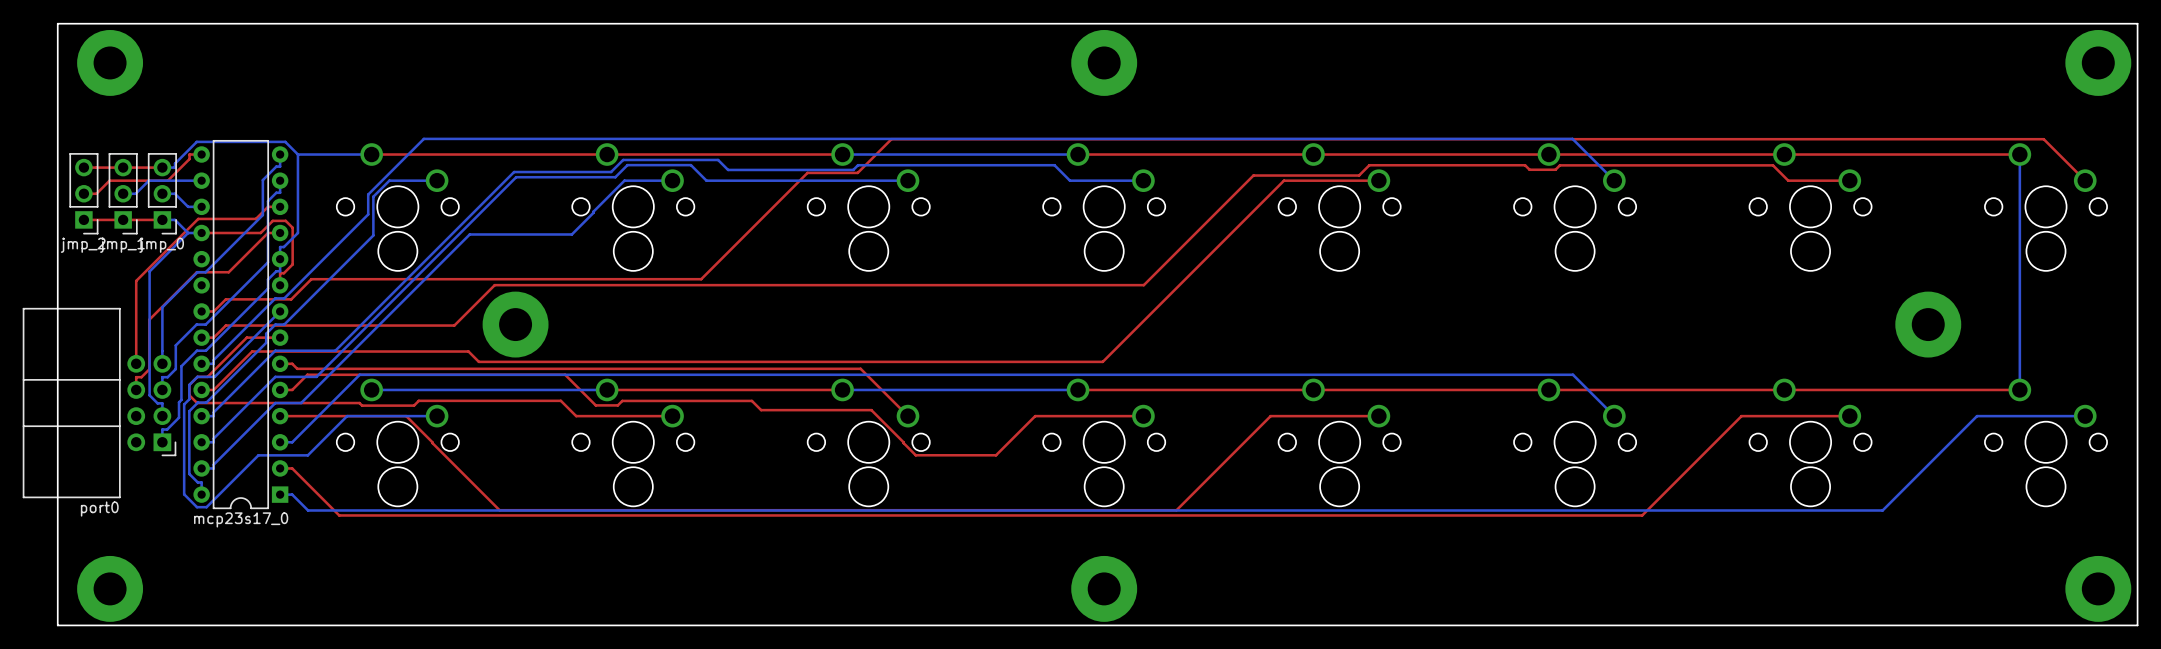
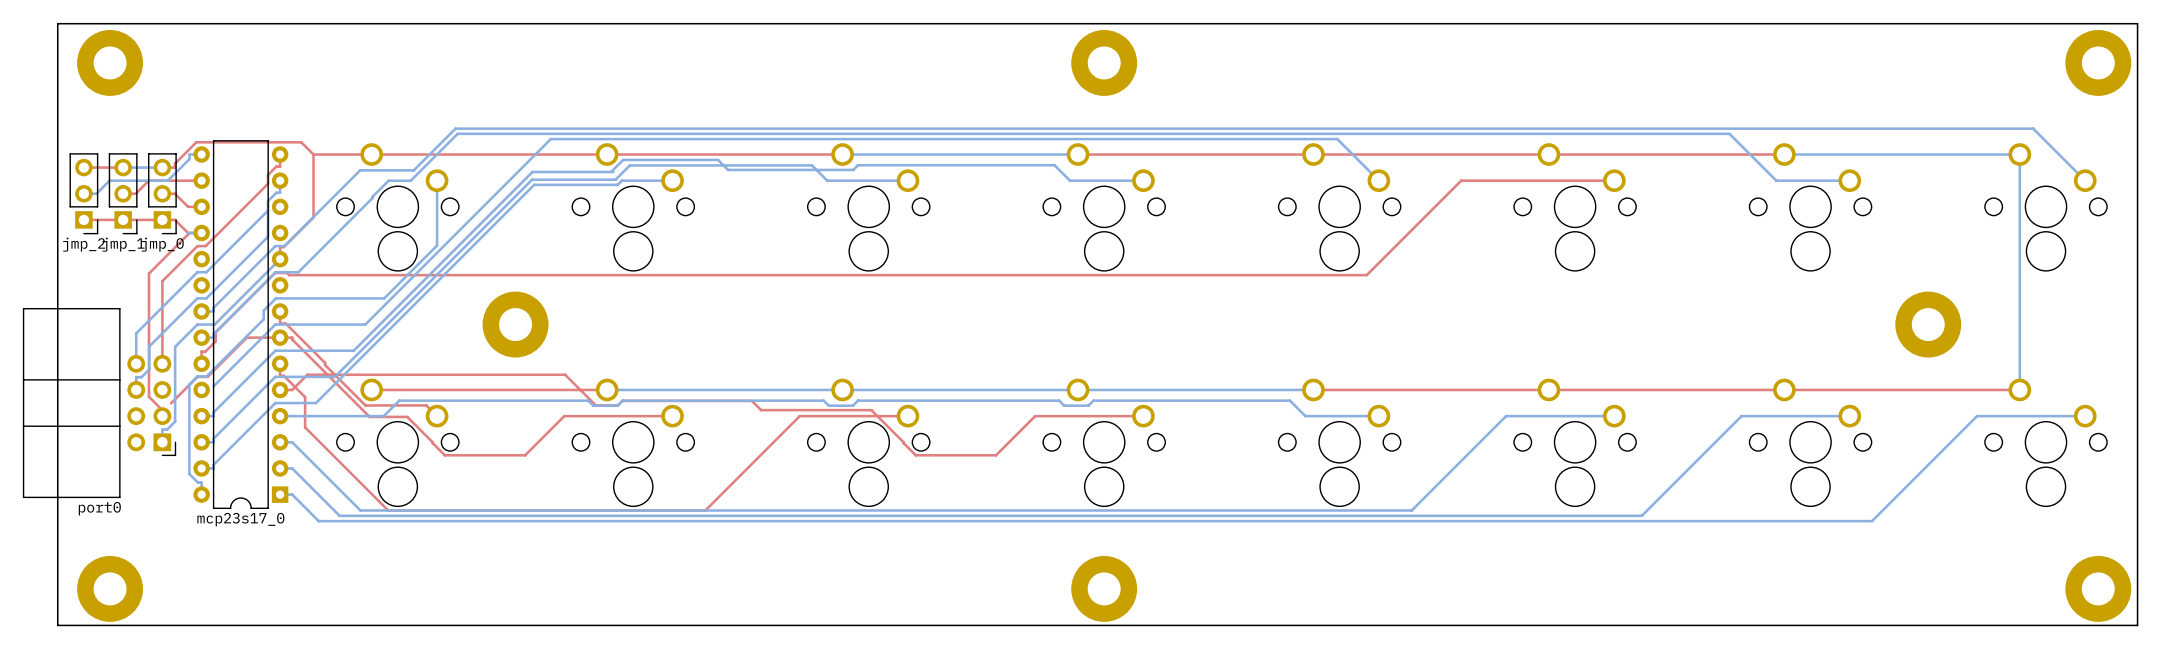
top track: (201, 154) (189, 154) (189, 159) (167, 180) -> (201, 180) (167, 180)
bottom track: (280, 154) (280, 166) (276, 166) (262, 180) (262, 215) (205, 272) -> (268, 210) (205, 272)
top track: none -> (280, 154) (280, 166) (276, 166) (268, 174) (268, 183) (205, 246) (197, 246) (162, 281) (162, 363)
bottom track: (297, 154) (285, 141) (196, 141) (175, 163) (175, 167) (162, 167) -> (123, 167) (162, 167)
bottom track: (297, 154) (297, 232) (283, 247) (280, 247) (280, 271) (276, 271) (268, 279) (268, 288) (205, 350) (196, 350) (181, 366) (181, 399) (179, 402) (179, 417) (175, 421) -> none
top track: none -> (313, 154) (313, 217) (283, 247) (280, 247) (280, 259)
bottom track: (371, 154) (297, 154) -> none
top track: none -> (371, 154) (313, 154)
bottom track: none -> (2019, 154) (1784, 154)
top track: (2019, 154) (1784, 154) -> none
top track: (162, 167) (123, 167) -> (162, 167) (175, 167) (175, 163) (196, 142) (301, 142) (313, 154)
bottom track: (532, 171) (514, 172) (335, 350) -> (532, 171) (353, 350) (335, 350)
bottom track: (148, 180) (135, 193) (123, 193) -> (148, 180) (109, 180) (96, 193) (83, 193)
top track: (148, 180) (109, 180) (96, 193) (83, 193) -> (148, 180) (135, 193) (123, 193)
bottom track: (201, 180) (167, 180) -> (201, 154) (189, 154) (189, 159) (167, 180)
bottom track: (437, 180) (389, 180) (373, 196) (373, 235) (284, 324) -> (437, 180) (437, 245) (384, 298) (284, 298)
bottom track: (624, 180) (571, 234) (469, 234) (301, 403) -> (624, 180) (617, 184) (534, 184) (315, 403) (301, 403)
bottom track: (827, 180) (706, 180) (690, 165) (627, 165) (615, 177) (516, 177) (316, 376) -> (827, 180) (812, 165) (629, 165) (615, 179) (532, 179) (334, 376) (316, 376)
bottom track: none -> (1378, 180) (1337, 139) (550, 139) (365, 324) (284, 324)
top track: (1378, 180) (1283, 180) (1102, 361) (478, 361) (468, 351) (252, 351) (213, 389) (201, 389) -> none
bottom track: (1614, 180) (1572, 138) (423, 138) (368, 194) (368, 214) (284, 298) -> none
top track: none -> (1614, 180) (1461, 180) (1366, 275) (289, 275) (287, 272) (275, 272) (215, 332) (215, 341) (205, 351) (201, 351) (201, 363)
bottom track: none -> (1849, 180) (1776, 180) (1729, 133) (457, 133) (410, 180) (388, 180) (298, 272) (275, 272) (213, 334) (213, 337) (201, 337)
top track: (1849, 180) (1788, 180) (1772, 165) (1559, 165) (1555, 169) (1529, 169) (1525, 165) (1369, 165) (1359, 175) (1253, 175) (1143, 285) (494, 285) (454, 325) (225, 325) (213, 337) (201, 337) -> none
bottom track: none -> (2085, 180) (2033, 128) (455, 128) (413, 170) (360, 170) (284, 246) (275, 246) (213, 307) (213, 311) (201, 311)
top track: (2085, 180) (2043, 139) (891, 139) (857, 172) (807, 172) (701, 279) (311, 279) (291, 299) (225, 299) (213, 311) (201, 311) -> none
bottom track: (162, 193) (175, 193) (188, 206) (201, 206) -> none
top track: none -> (162, 193) (175, 193) (188, 206) (201, 206)
top track: (280, 206) (268, 206) (255, 218) (198, 218) (136, 280) (136, 363) -> none
bottom track: (162, 219) (175, 219) (188, 233) (149, 271) (149, 395) (157, 403) (162, 403) (162, 416) -> none
top track: none -> (162, 219) (175, 219) (188, 233)
top track: (201, 233) (260, 233) (272, 220) (285, 220) (292, 227) (292, 264) (283, 273) (280, 273) (280, 285) -> (201, 233) (189, 233) (148, 273) (148, 396) (162, 410)
top track: (280, 233) (268, 233) (228, 272) (196, 272) (149, 319) (149, 369) (141, 377) (136, 377) (136, 389) -> none
bottom track: (268, 236) (268, 262) (205, 324) -> (280, 259) (214, 324) (205, 324)
bottom track: none -> (268, 236) (206, 298) (197, 298) (149, 346) (149, 369) (141, 377) (136, 377) (136, 389)
bottom track: (197, 272) (162, 307) (162, 363) -> (197, 272) (136, 333) (136, 363)
bottom track: (275, 298) (213, 360) (213, 363) (201, 363) -> none
bottom track: (280, 311) (214, 376) (197, 376) (189, 384) (189, 399) (184, 404) (184, 494) (197, 507) (206, 507) (258, 455) (307, 455) (347, 416) -> (280, 416) (347, 416)
top track: none -> (280, 311) (280, 323) (285, 323) (365, 405) (426, 405) (437, 416)
bottom track: (197, 324) (175, 345) (175, 369) (167, 377) (162, 377) (162, 389) -> (197, 324) (175, 346) (175, 421)
bottom track: (266, 333) (266, 342) (206, 402) (197, 402) (189, 411) (189, 473) -> (275, 298) (263, 310) (263, 319) (206, 376) (197, 376) (189, 384) (189, 474)
top track: (280, 363) (292, 363) (297, 368) (860, 368) (907, 416) -> (280, 363) (280, 375) (283, 375) (305, 397) (305, 427) (388, 510) (705, 510) (799, 416) (907, 416)
top track: (189, 384) (189, 395) (197, 403) (359, 403) (362, 405) (414, 405) (418, 400) (560, 400) (576, 416) -> (280, 337) (292, 337) (369, 416) (407, 416) (444, 455) (525, 455) (564, 416) (576, 416)
bottom track: (607, 389) (371, 389) -> (607, 389) (842, 389)
top track: (842, 389) (607, 389) -> (371, 389) (607, 389)
bottom track: none -> (1313, 389) (1078, 389)
top track: (1313, 389) (1078, 389) -> none
bottom track: (437, 416) (383, 416) -> (1378, 416) (1305, 416) (1289, 400) (1093, 400) (1088, 405) (1064, 405) (1059, 400) (858, 400) (853, 405) (828, 405) (823, 400) (622, 400) (617, 405) (593, 405) (588, 400) (399, 400) (383, 416)
top track: (1378, 416) (1270, 416) (1176, 510) (499, 510) (406, 416) (280, 416) -> none
bottom track: (1614, 416) (1572, 374) (359, 374) (292, 442) -> none
bottom track: none -> (1849, 416) (1741, 416) (1641, 515) (339, 515) (292, 468) (280, 468)
top track: (1849, 416) (1741, 416) (1642, 515) (339, 515) (292, 468) (280, 468) -> none
bottom track: (360, 510) (308, 510) -> (360, 510) (292, 442)
bottom track: (1882, 510) (1411, 510) -> (1614, 416) (1506, 416) (1411, 510)
bottom track: none -> (1882, 510) (1871, 521) (318, 521) (308, 510)

